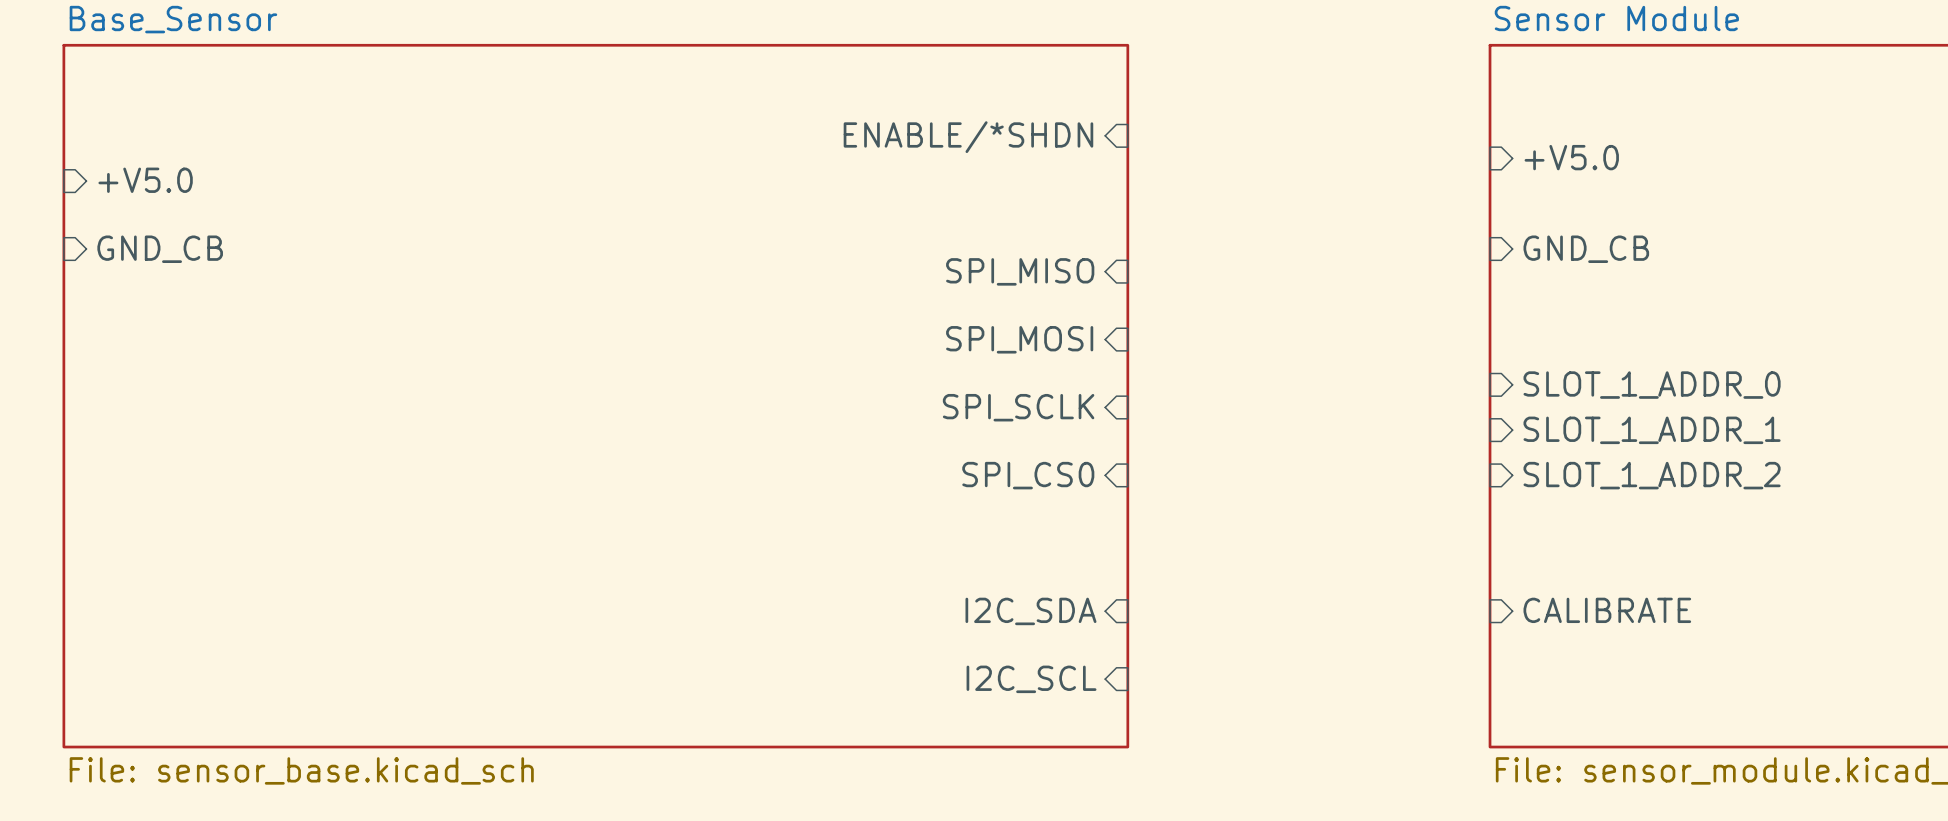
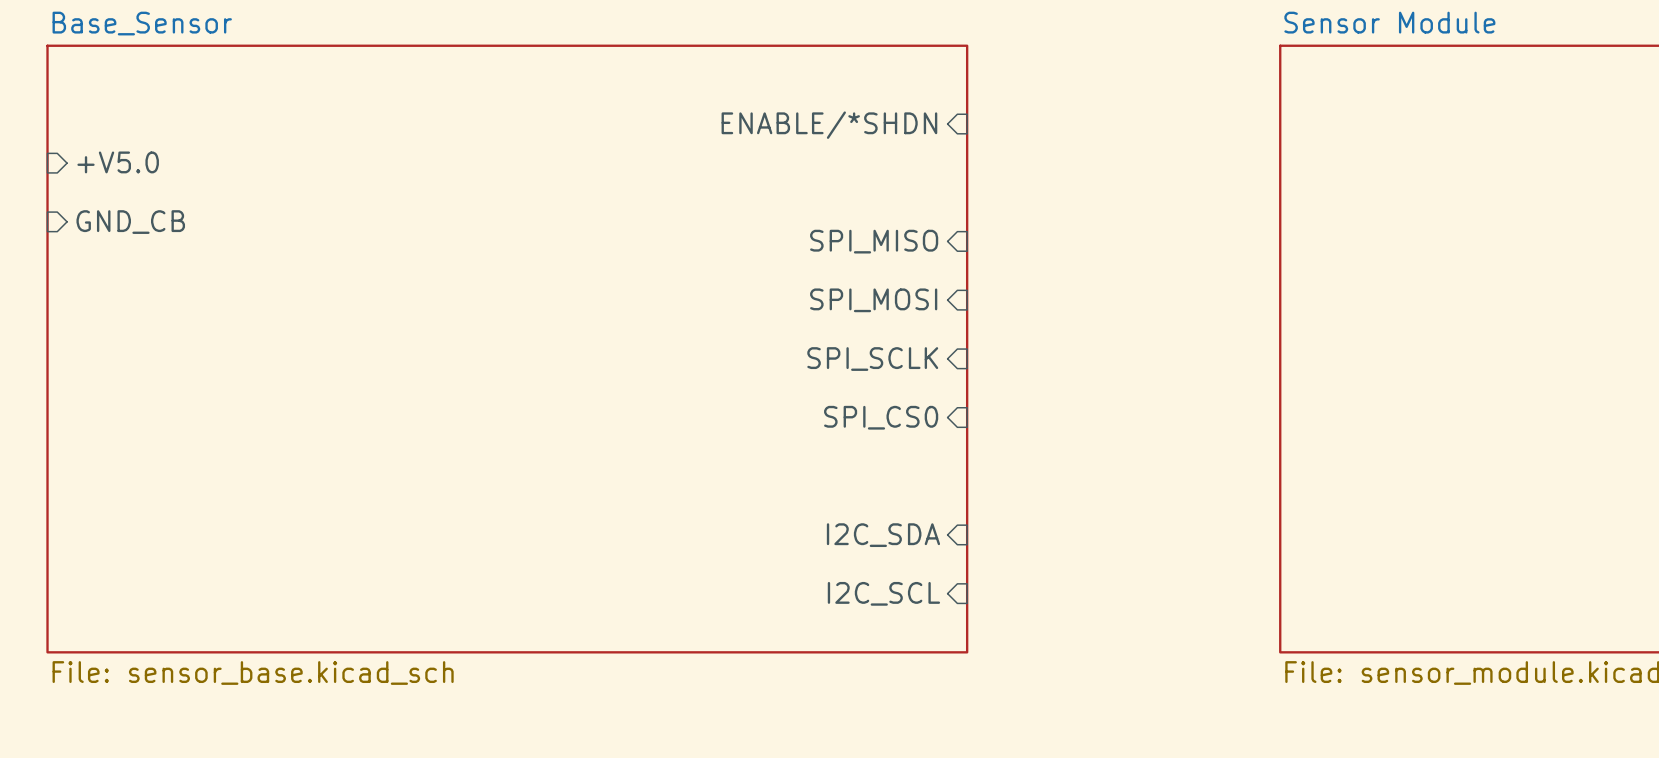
sheet pin: +V5.0 (1571, 157) -> none
sheet pin: GND_CB (1586, 249) -> none
sheet pin: SLOT_1_ADDR_0 (1652, 385) -> none
sheet pin: SLOT_1_ADDR_1 (1652, 430) -> none
sheet pin: SLOT_1_ADDR_2 (1652, 475) -> none
sheet pin: CALIBRATE (1607, 610) -> none

